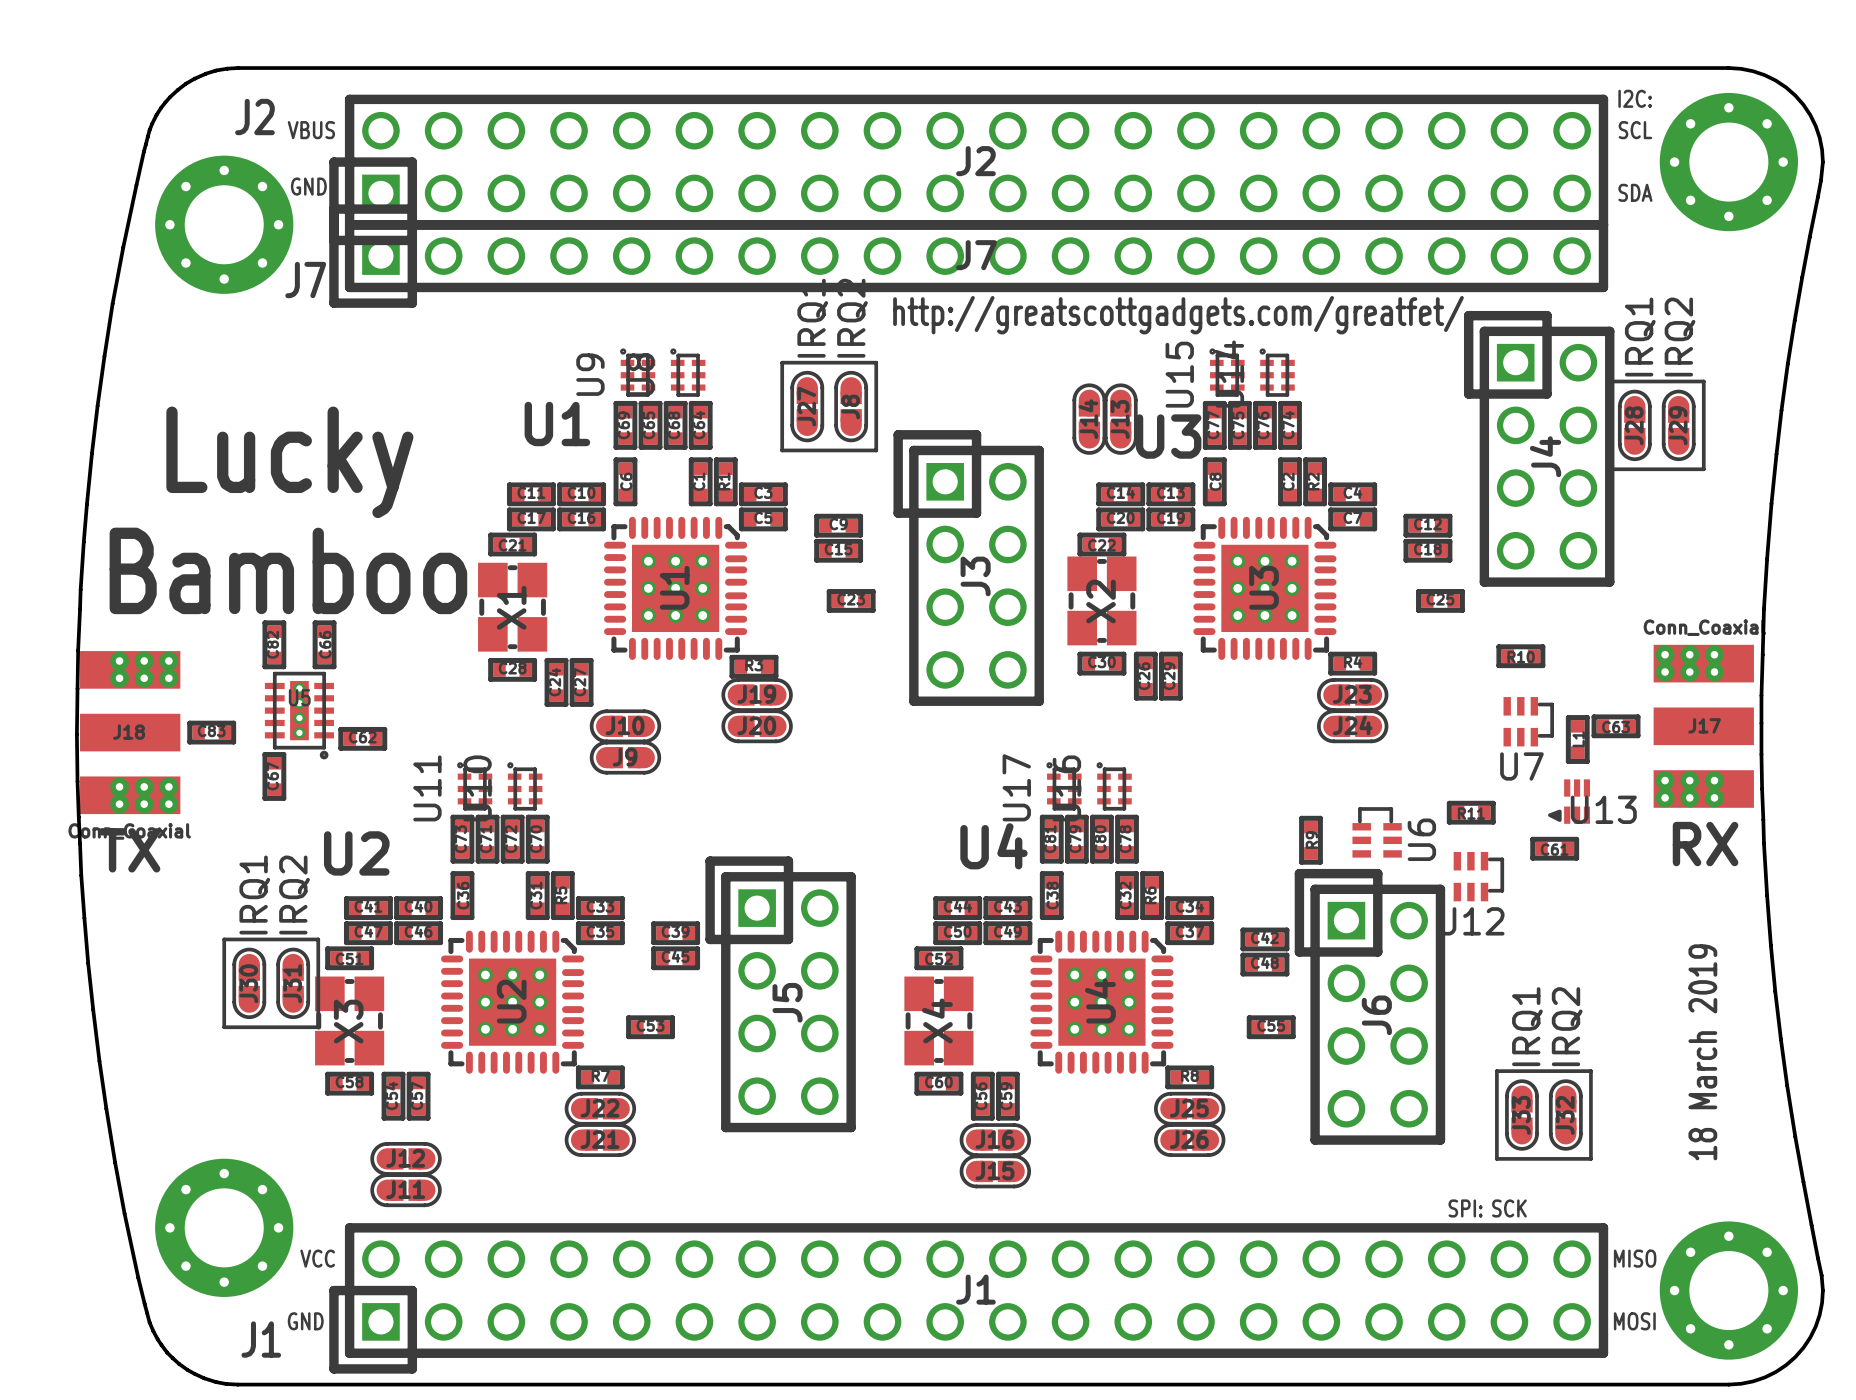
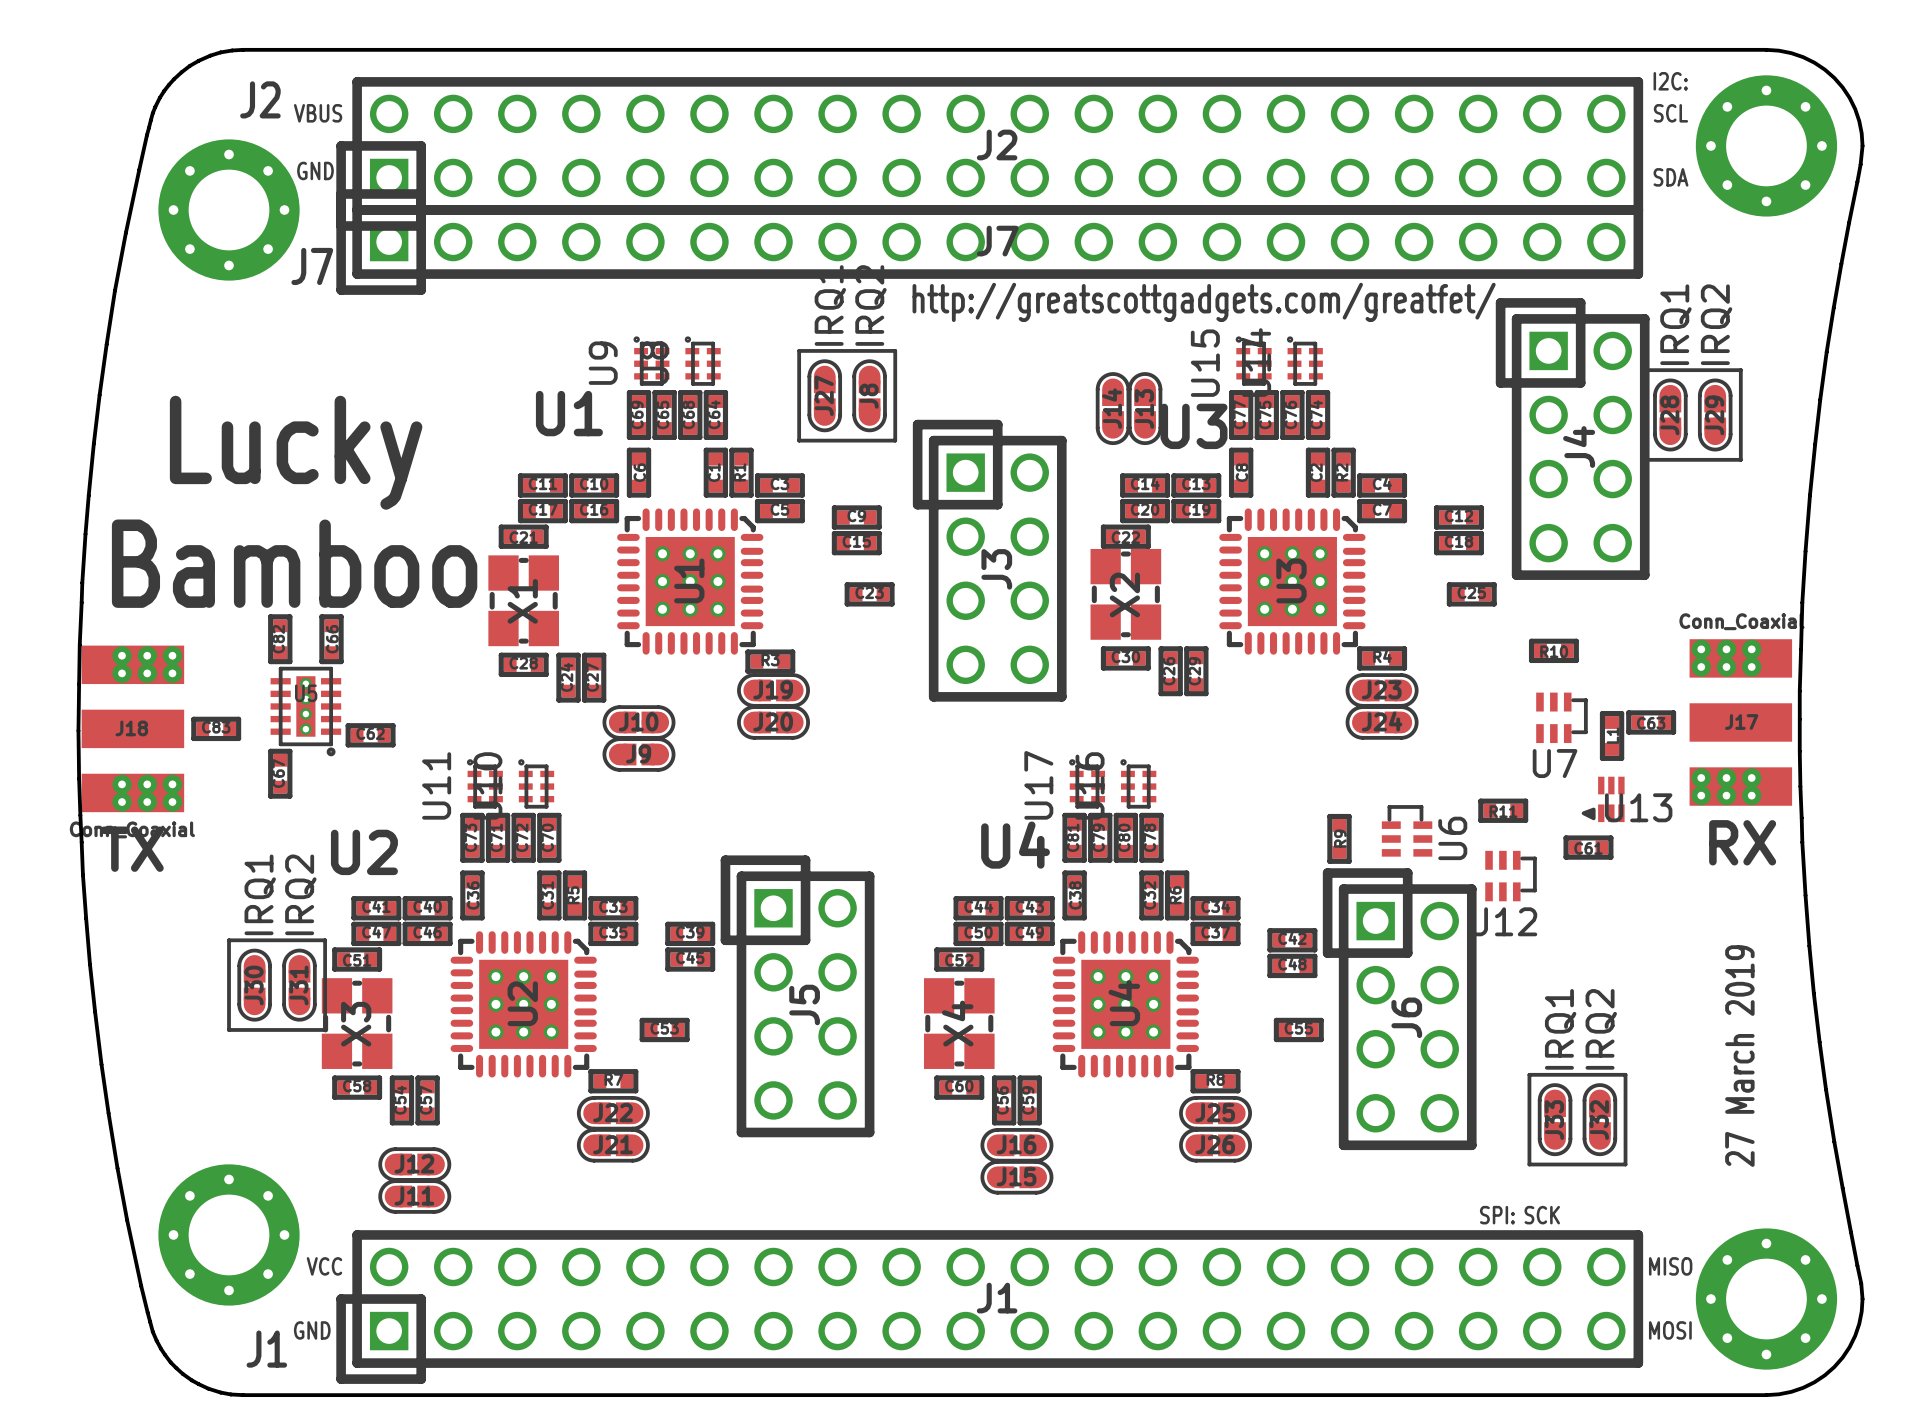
text: 18 March 2019 (1702, 1052) -> 27 March 2019 (1739, 1056)

